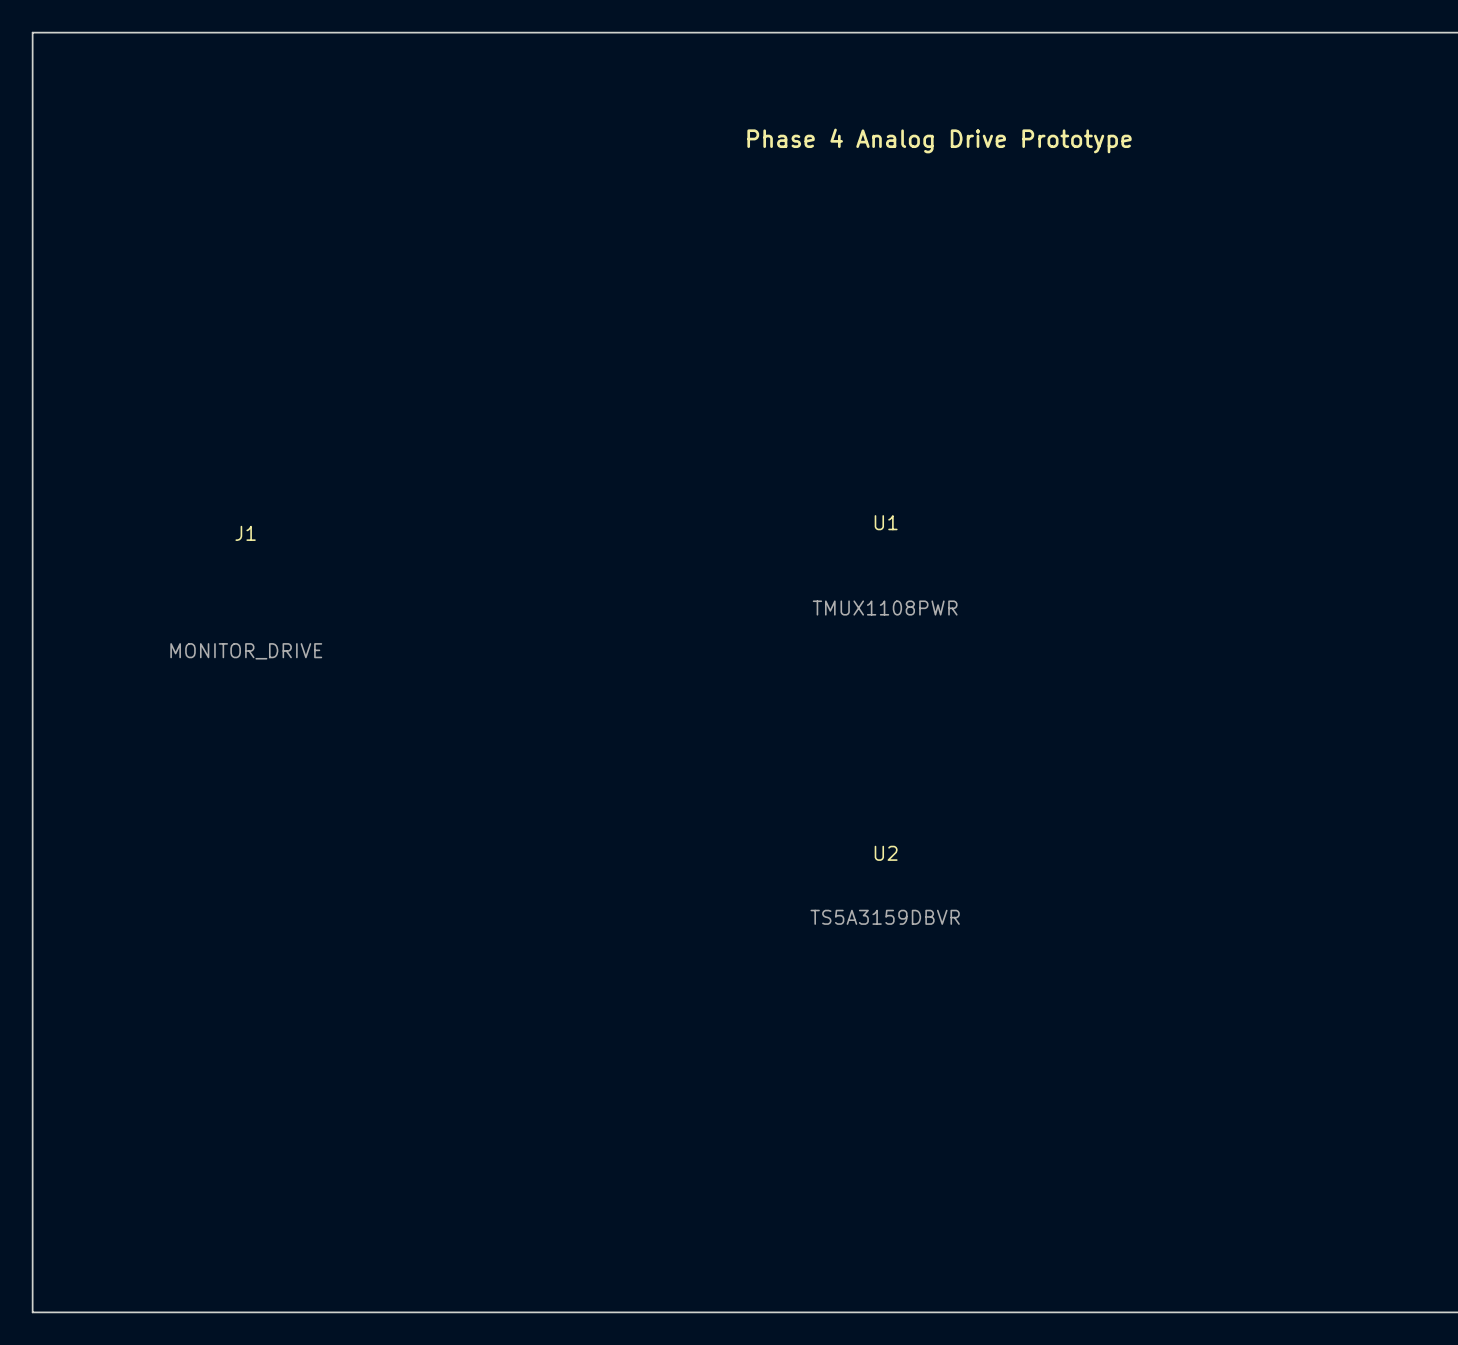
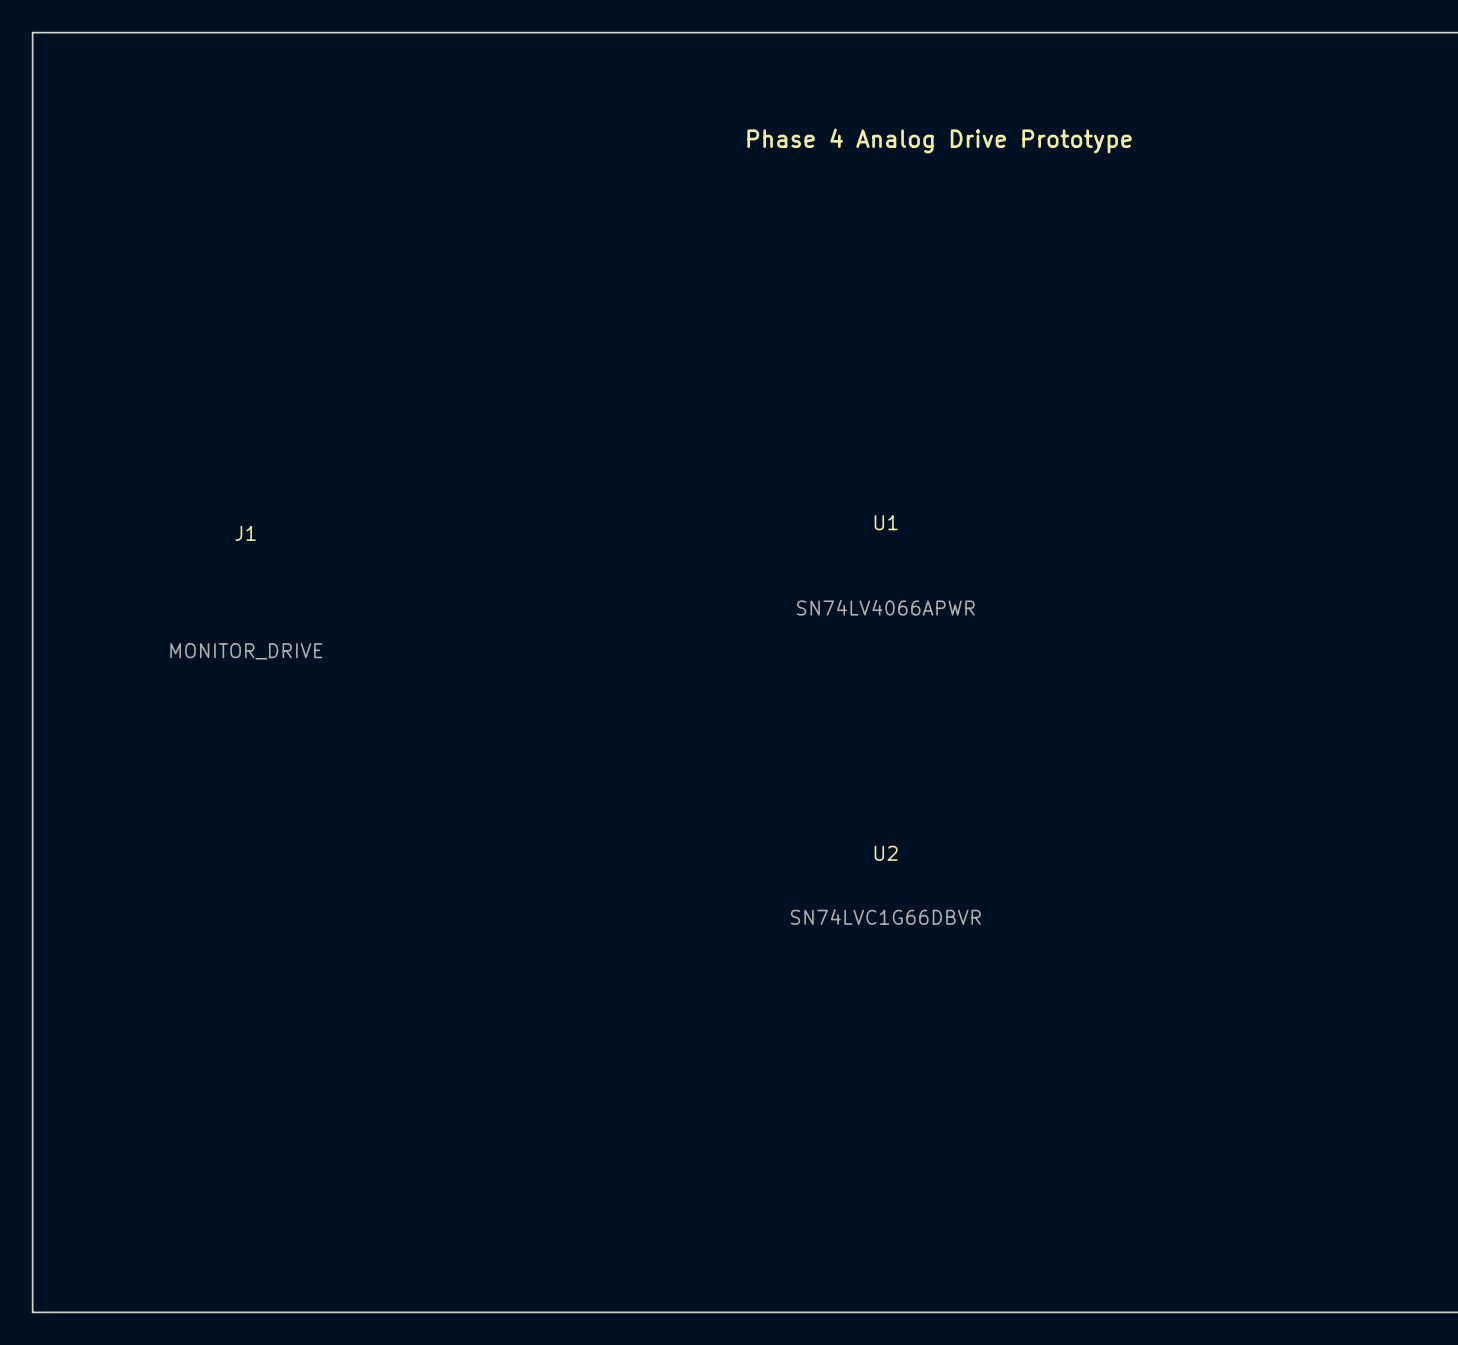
U1 value: TMUX1108PWR (885, 608) -> SN74LV4066APWR (885, 607)
U2 value: TS5A3159DBVR (885, 917) -> SN74LVC1G66DBVR (885, 916)

